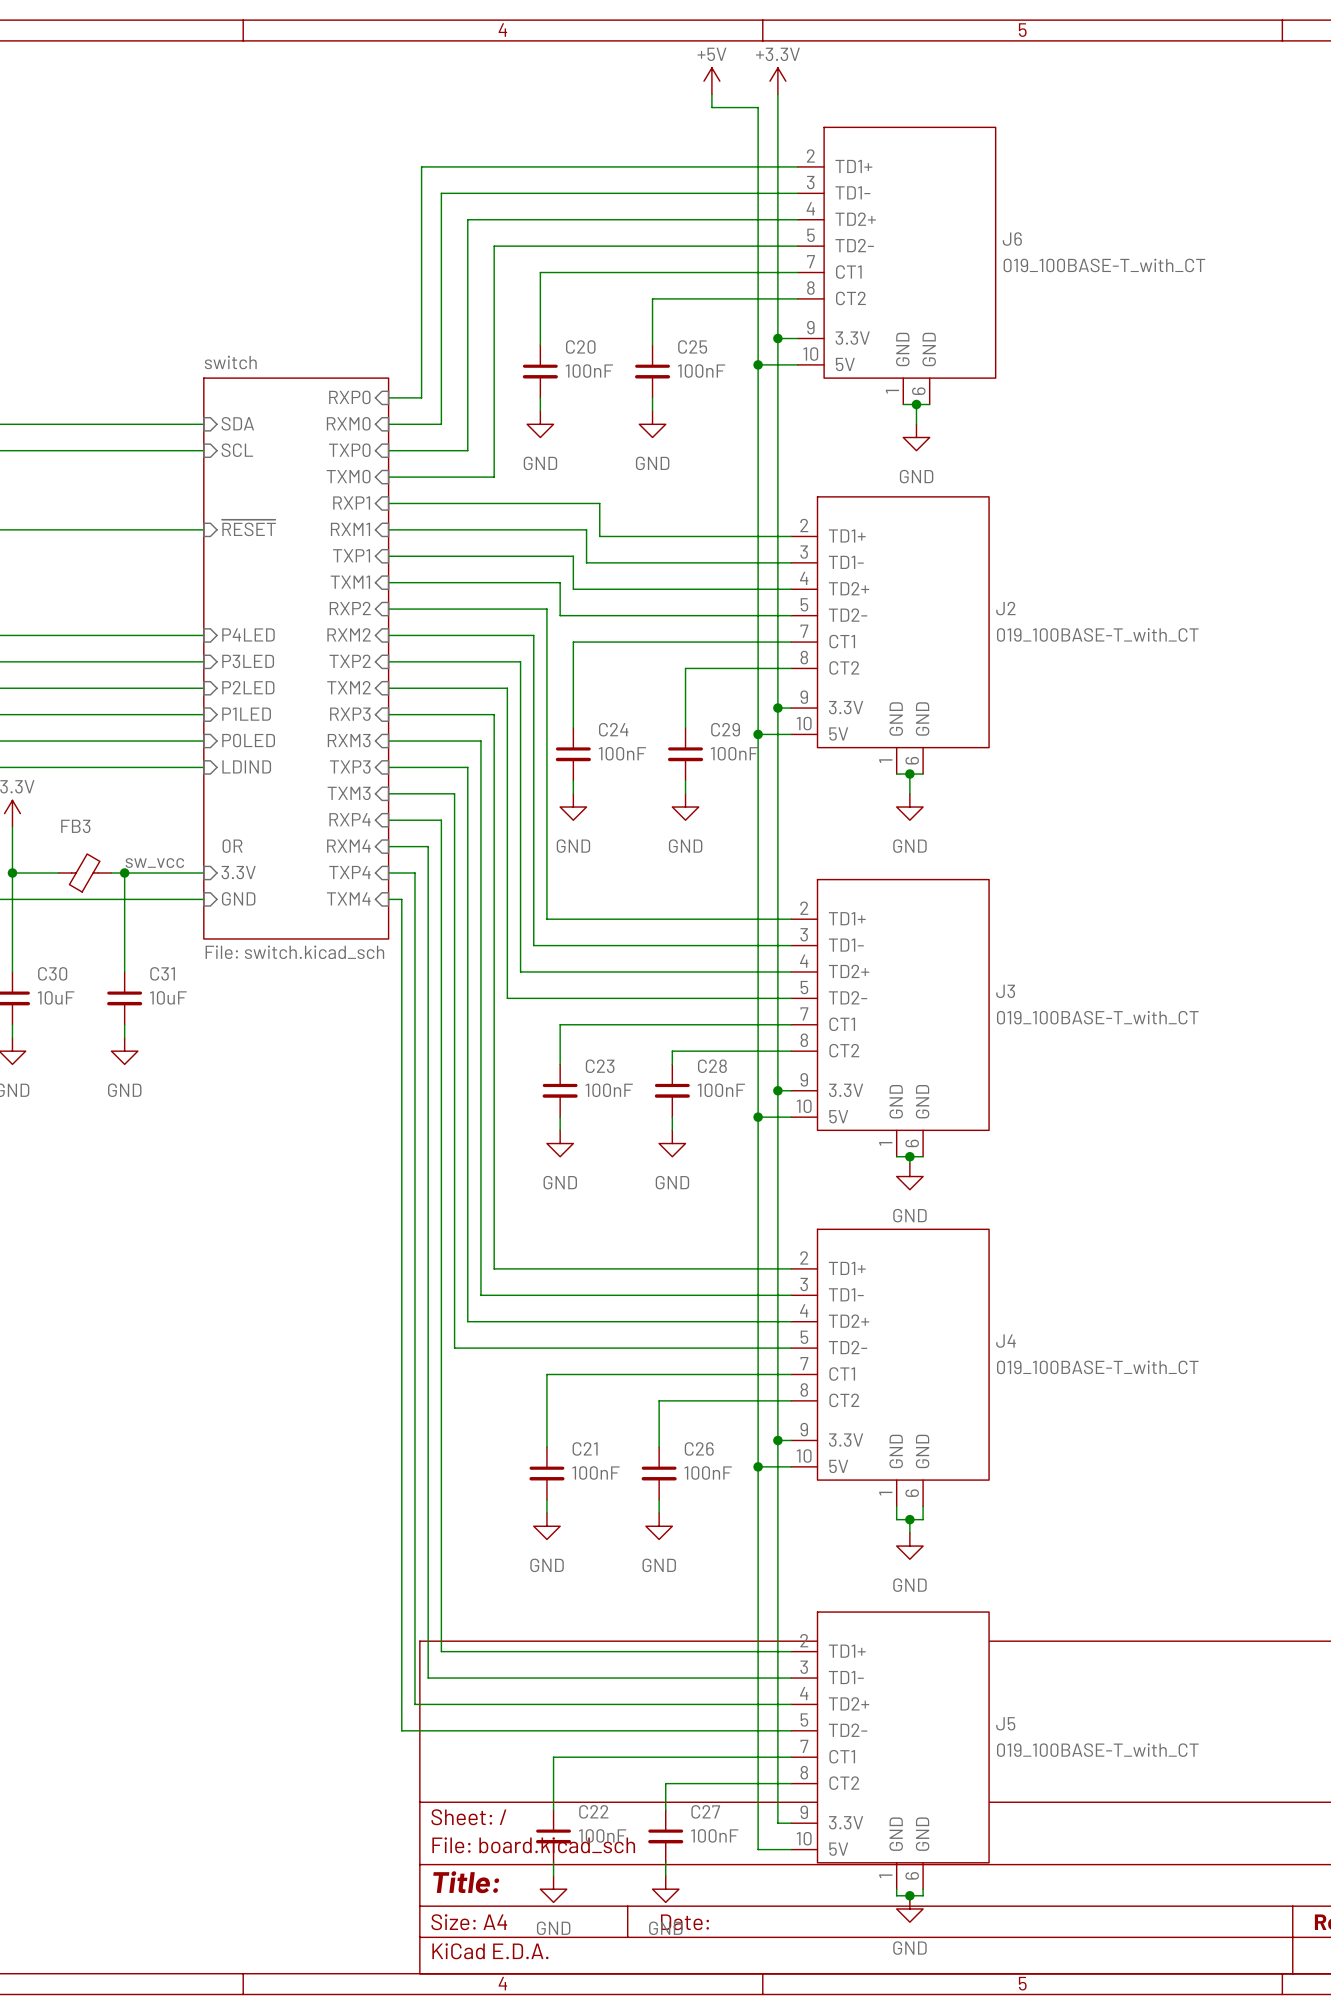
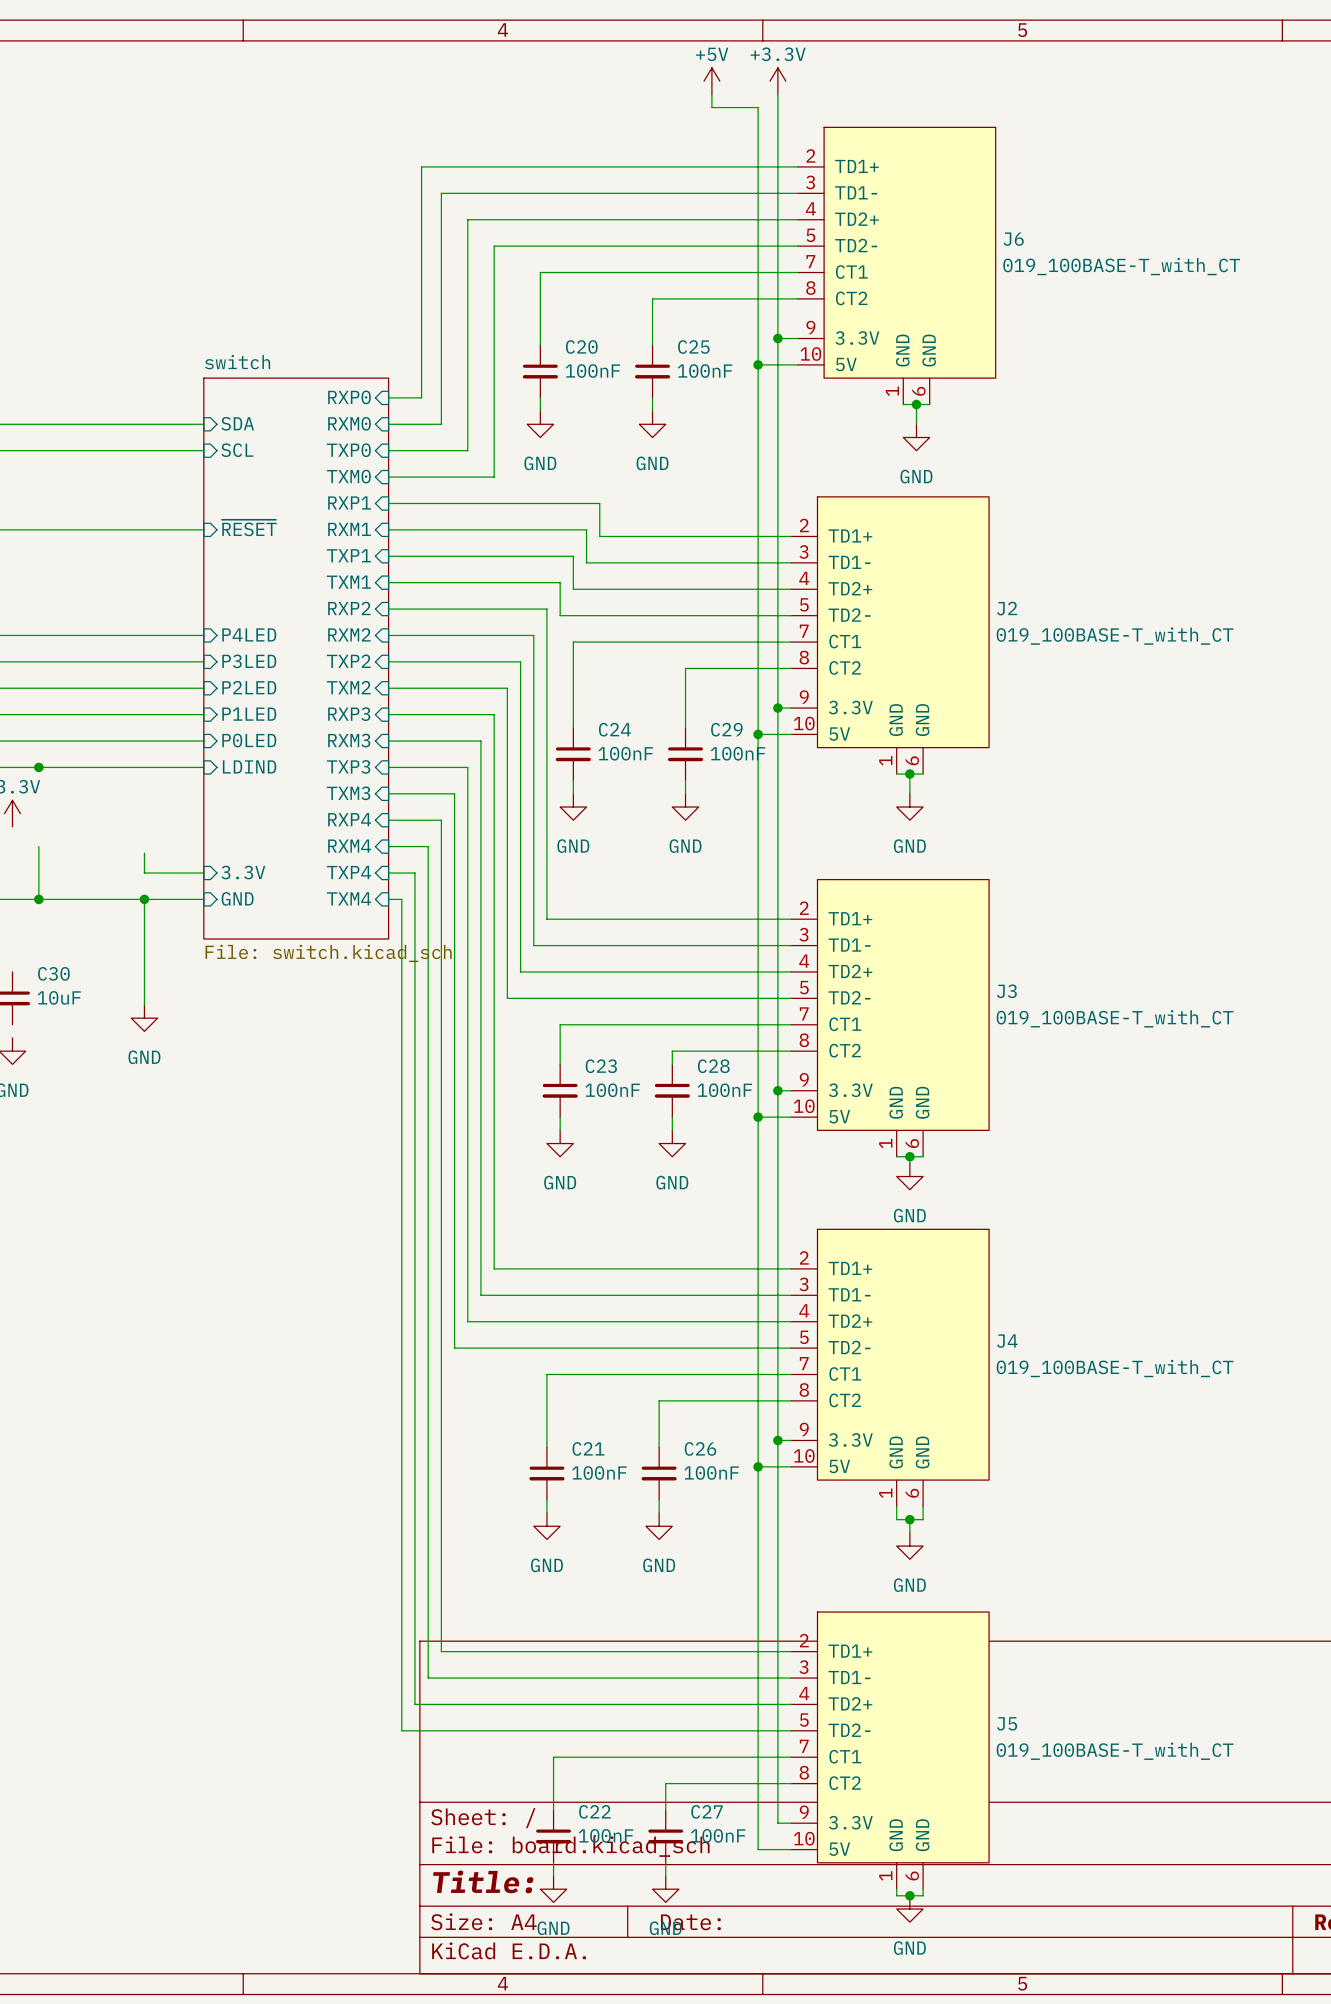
junction: none -> (38, 767)
wire: (12, 826) (12, 971) -> none
wire: none -> (38, 846) (38, 899)
label: sw_vcc (154, 863) -> none
wire: (12, 873) (58, 873) -> none
junction: (12, 873) -> none
FB3: 0R (85, 873) -> none
wire: (111, 873) (144, 873) -> (144, 853) (144, 873)
wire: (124, 873) (124, 971) -> none
junction position: (124, 873) -> (144, 899)
junction: none -> (38, 899)
wire: none -> (144, 899) (144, 1004)
C31: 10uF (124, 998) -> none
wire: (12, 1024) (12, 1037) -> none
wire: (124, 1024) (124, 1037) -> none
power symbol position: GND (124, 1051) -> GND (144, 1018)

